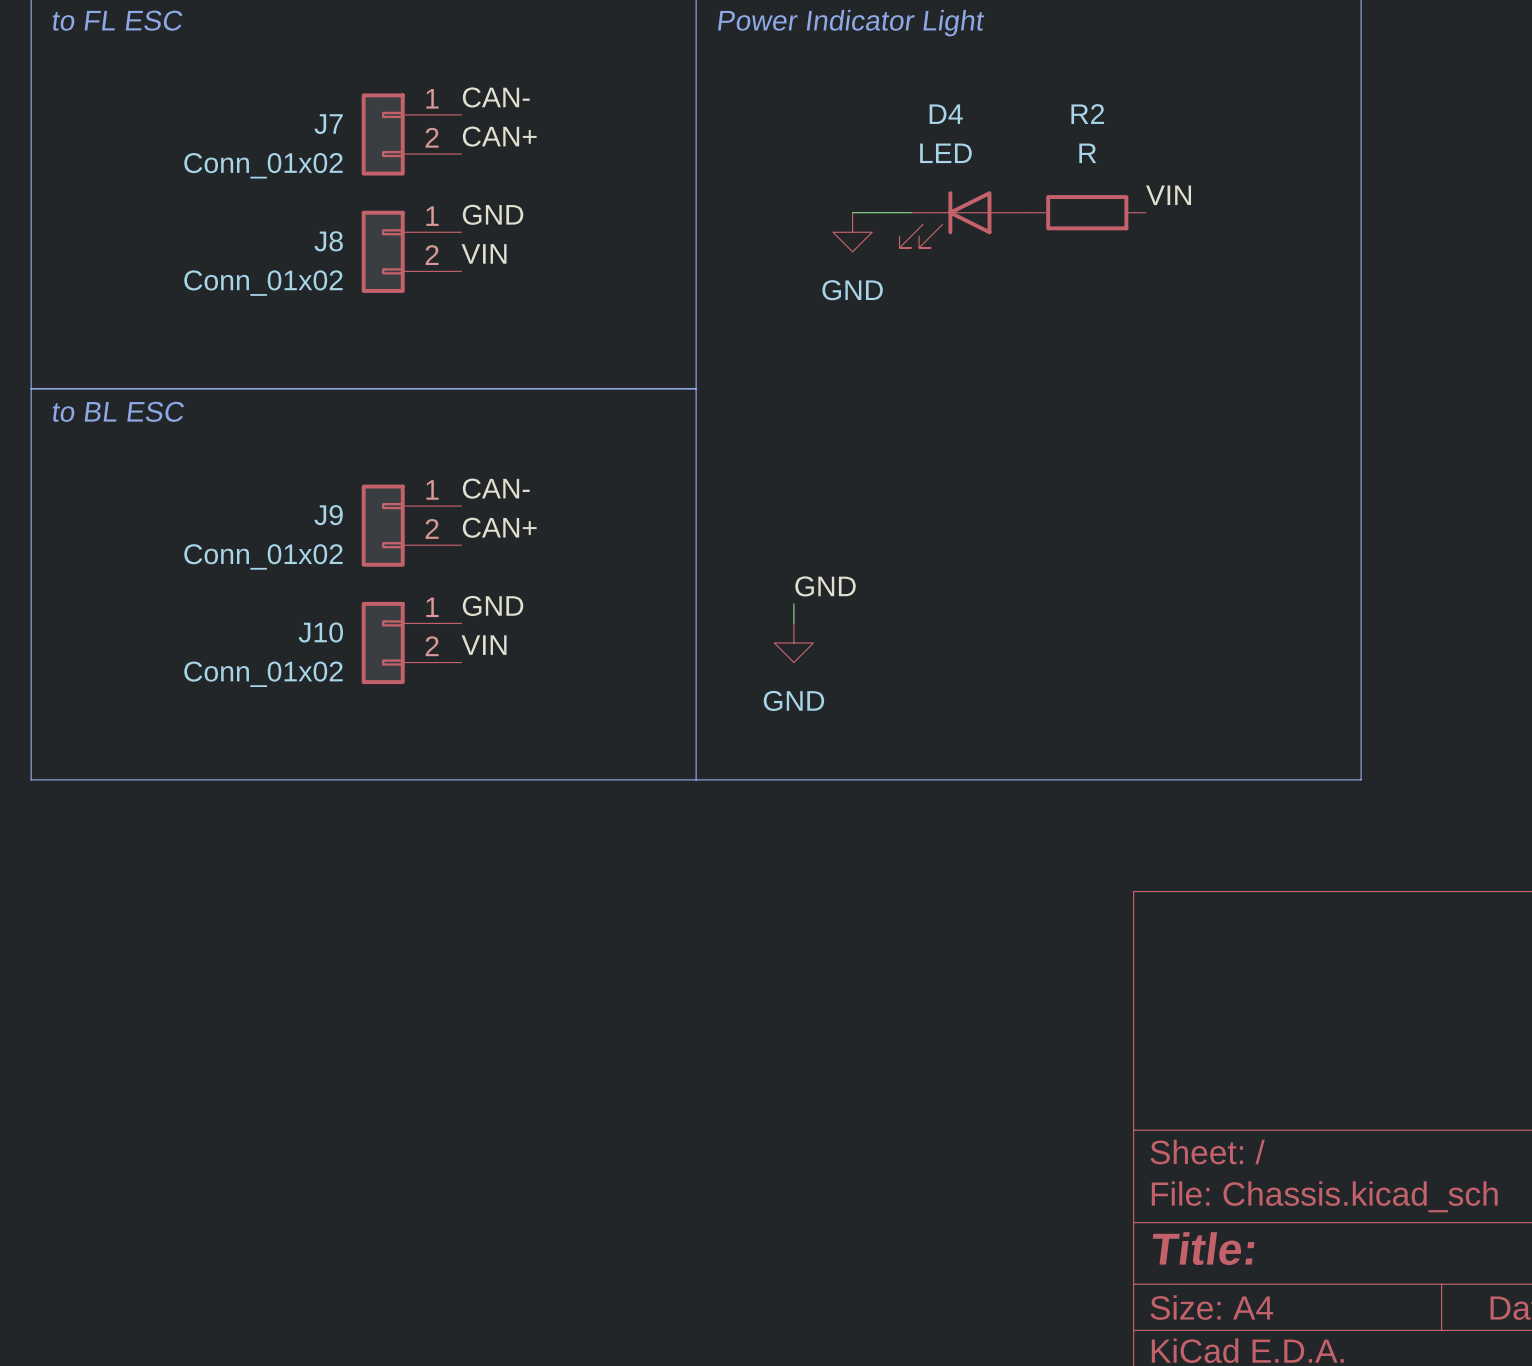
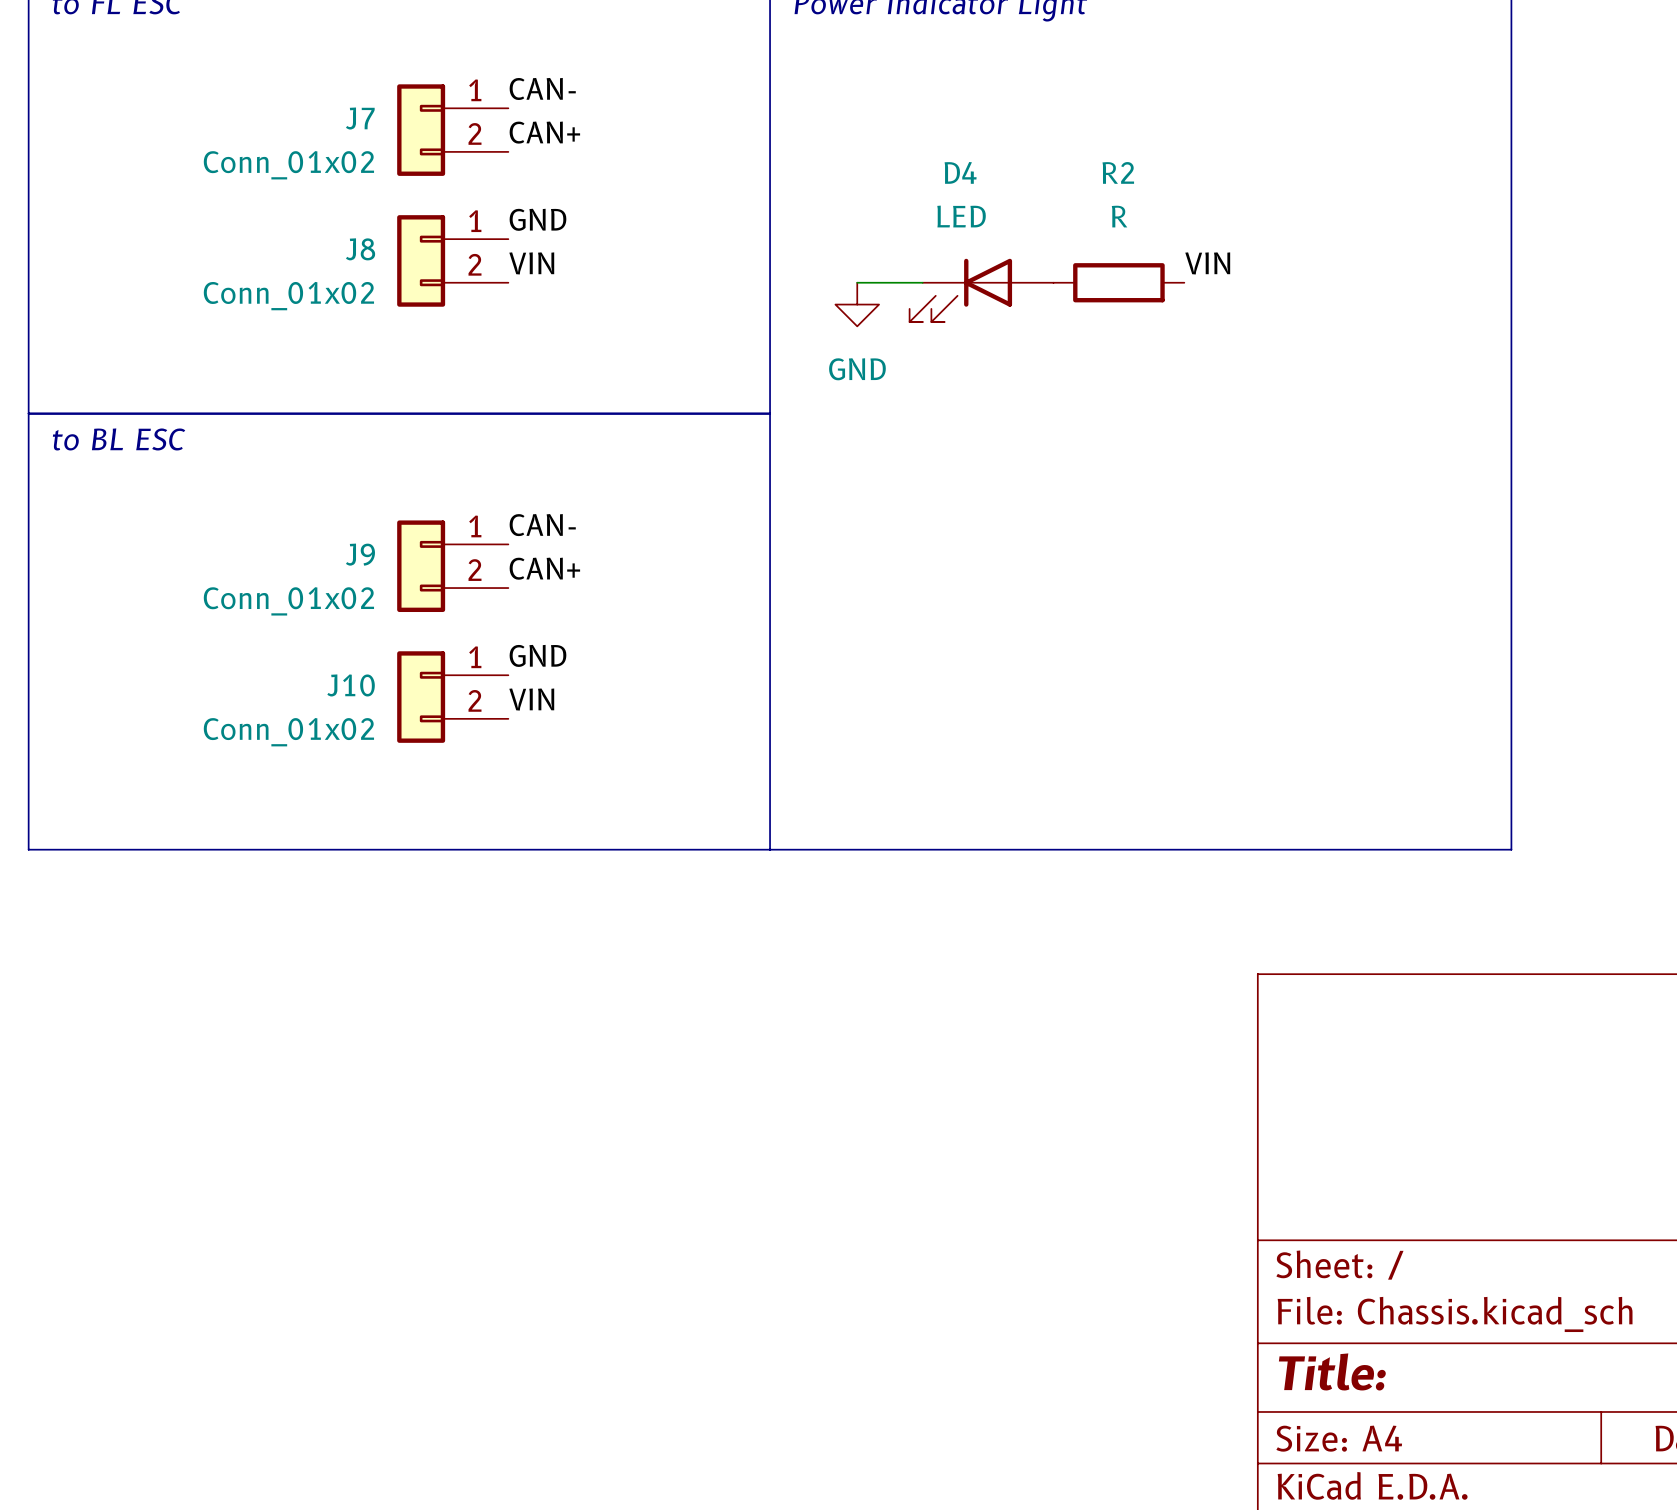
label position: VIN (1168, 195) -> VIN (1207, 263)
wire: (852, 212) (911, 212) -> (857, 282) (922, 282)
R2 position: (1087, 212) -> (1118, 282)
D4 position: (964, 219) -> (981, 290)
power symbol position: GND (852, 232) -> GND (857, 304)
label: GND (825, 586) -> none
wire: (793, 603) (793, 623) -> none
power symbol: GND (793, 642) -> none

